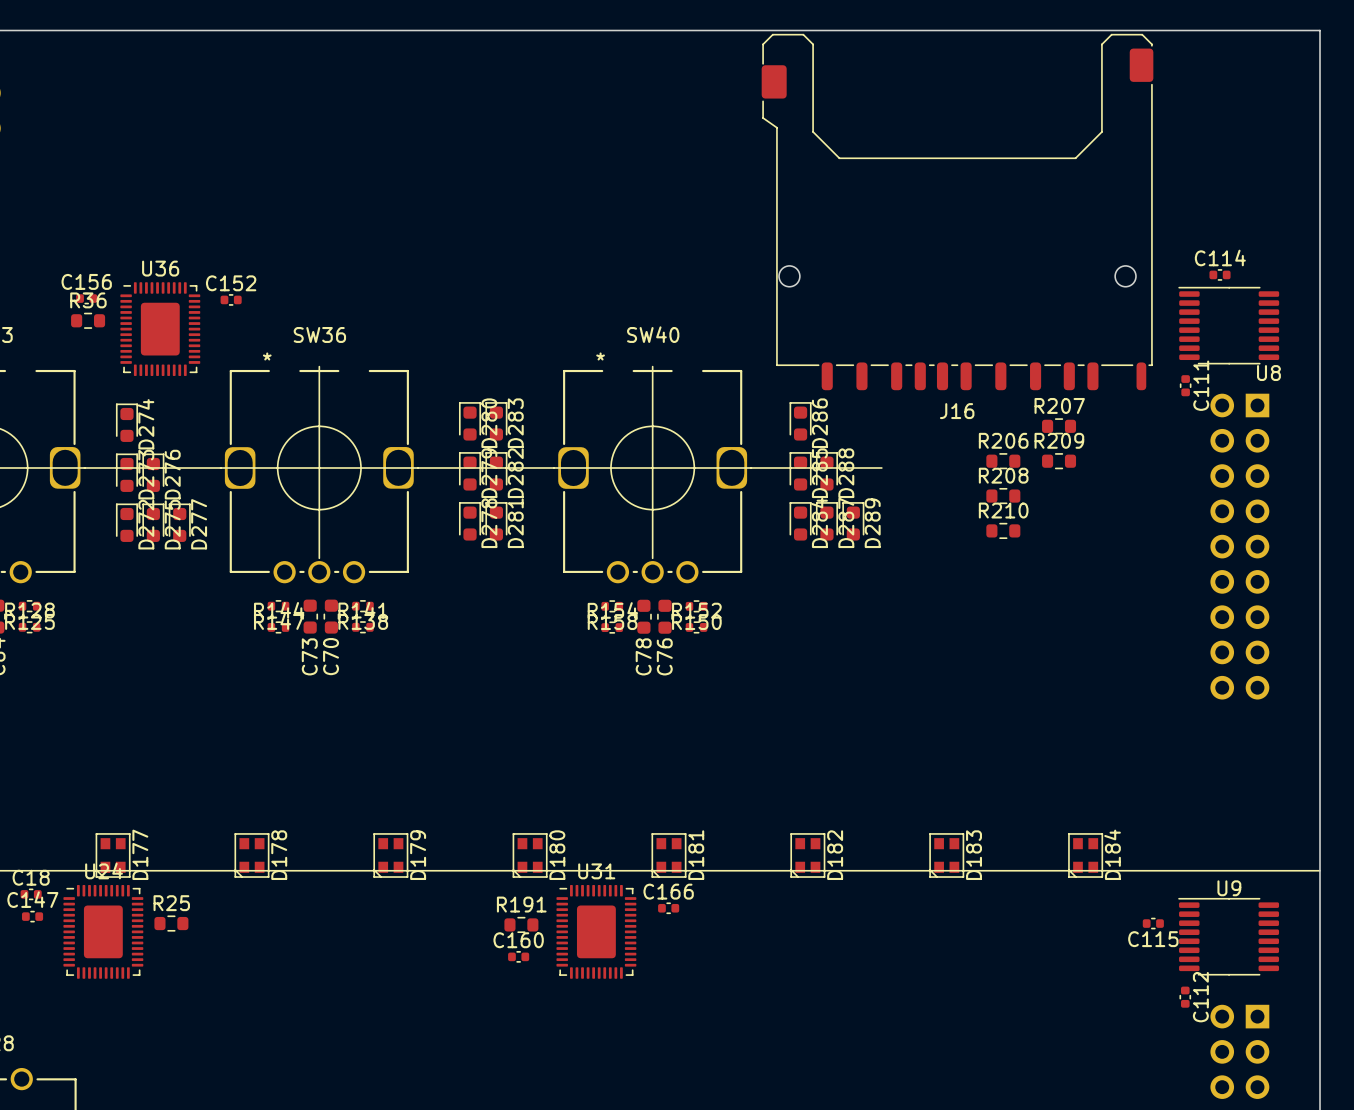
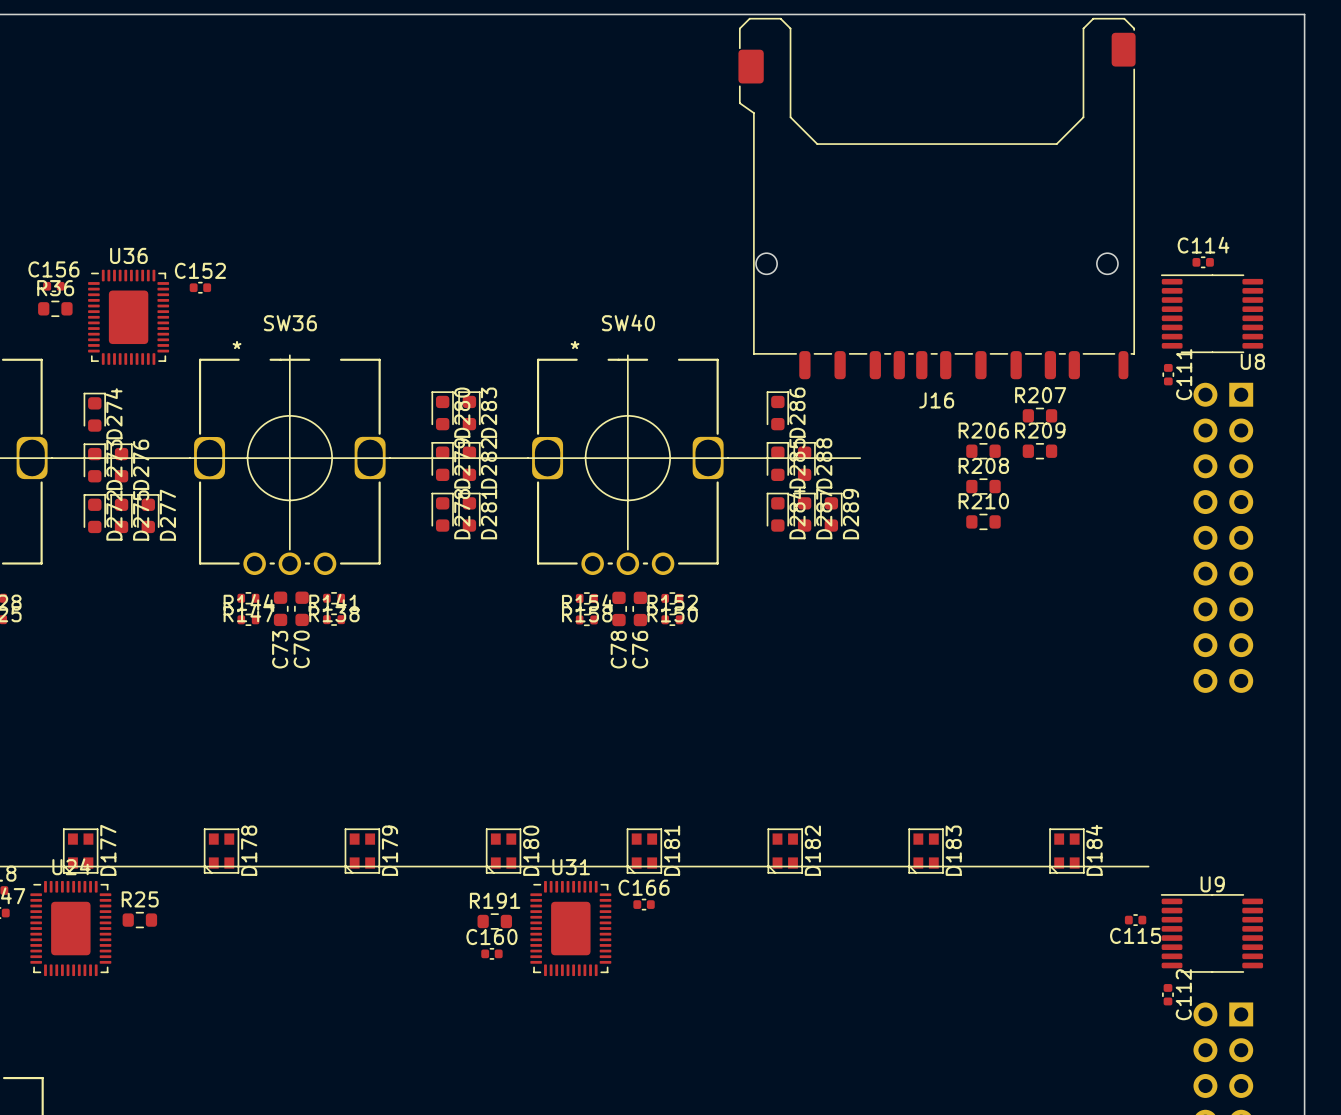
line: (1166, 870) (1320, 870) -> none

